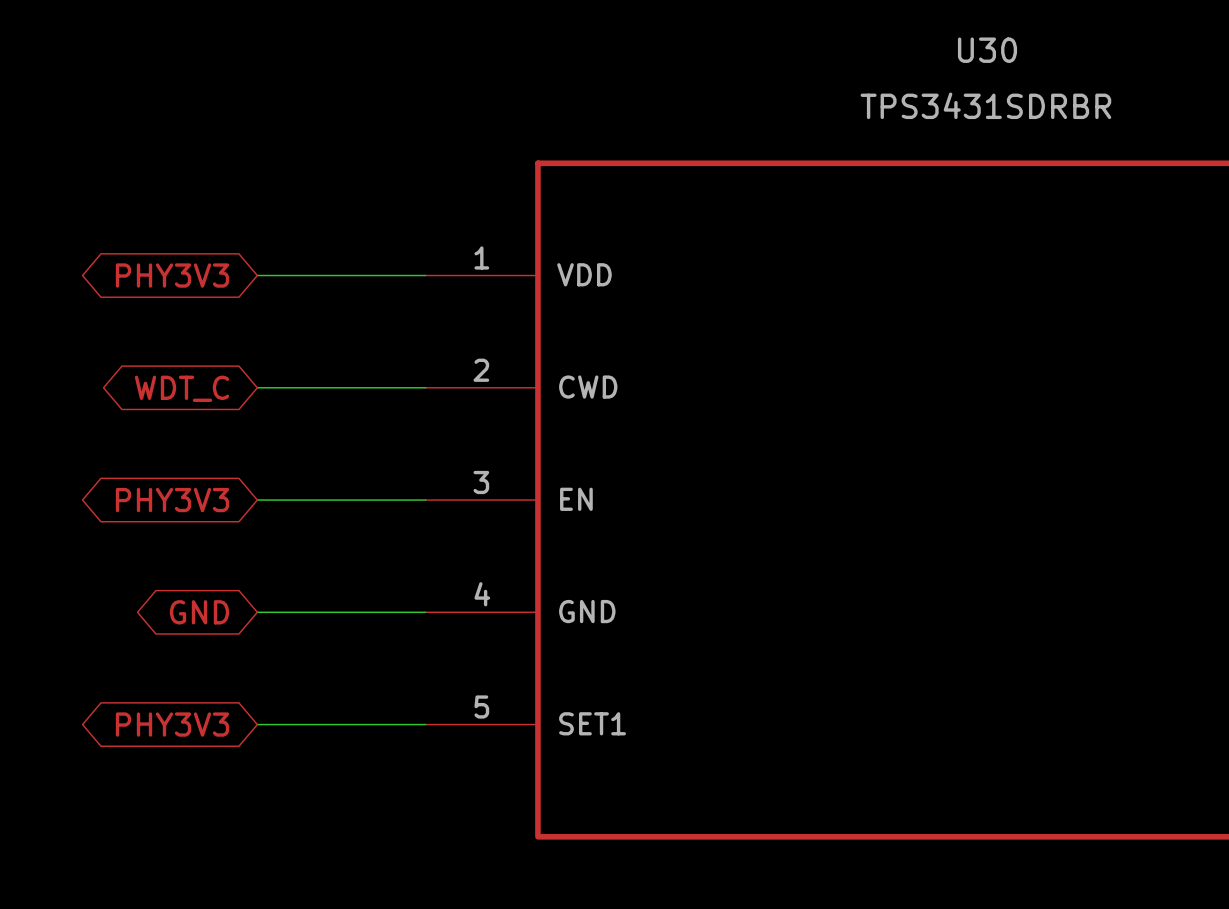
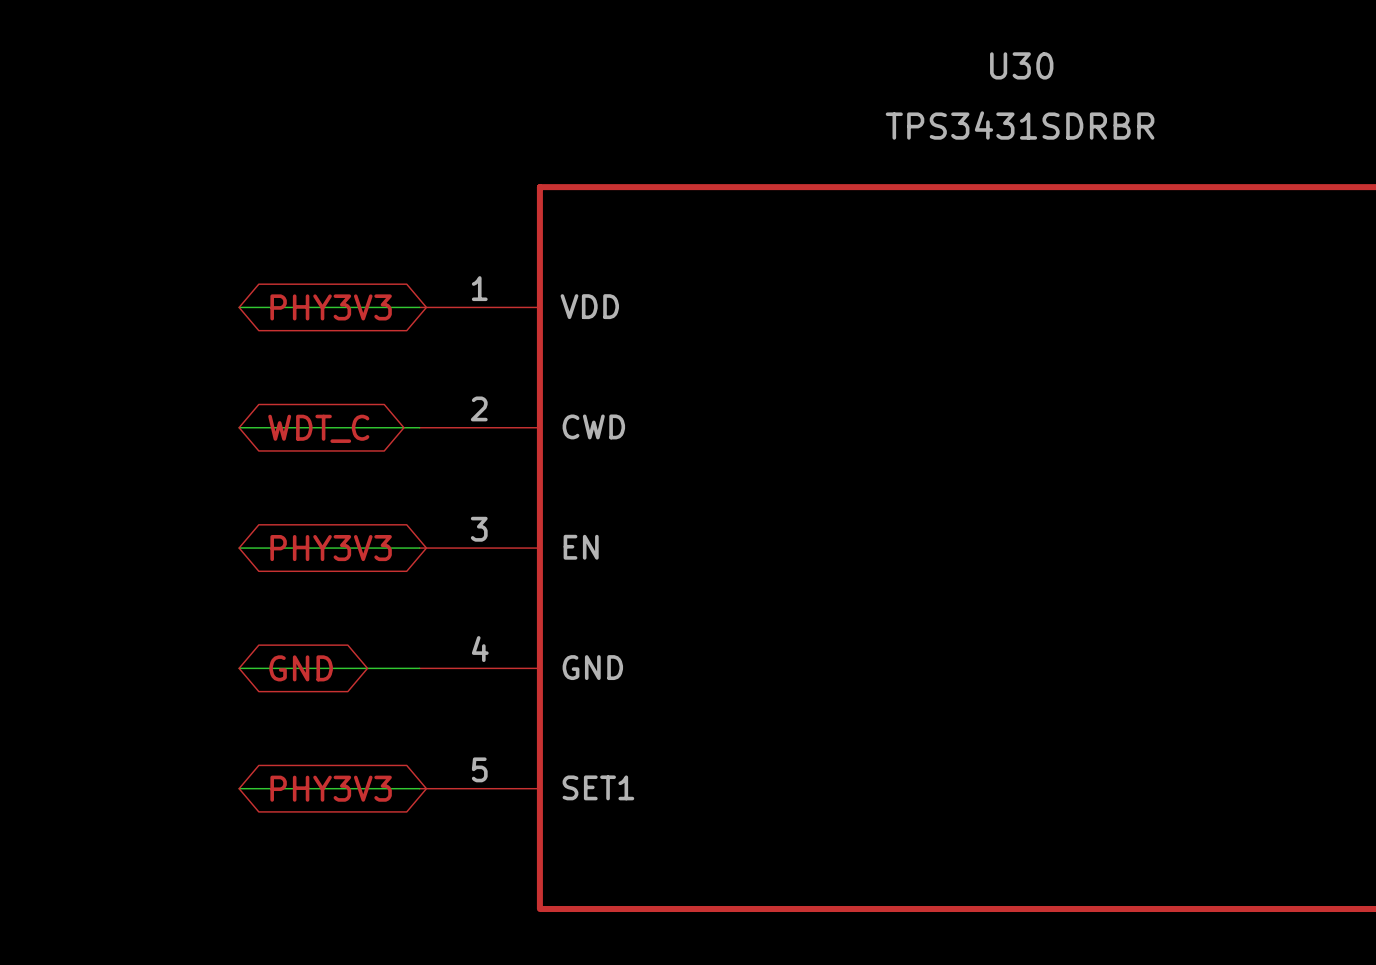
global label rotation: 0° (172, 275) -> 180° (331, 307)
global label rotation: 0° (181, 388) -> 180° (318, 428)
global label position: WDT_C (181, 388) -> WDT_C (318, 428)
global label rotation: 0° (172, 500) -> 180° (331, 548)
global label rotation: 0° (199, 612) -> 180° (301, 668)
global label position: GND (199, 612) -> GND (301, 668)
global label rotation: 0° (172, 724) -> 180° (331, 788)

